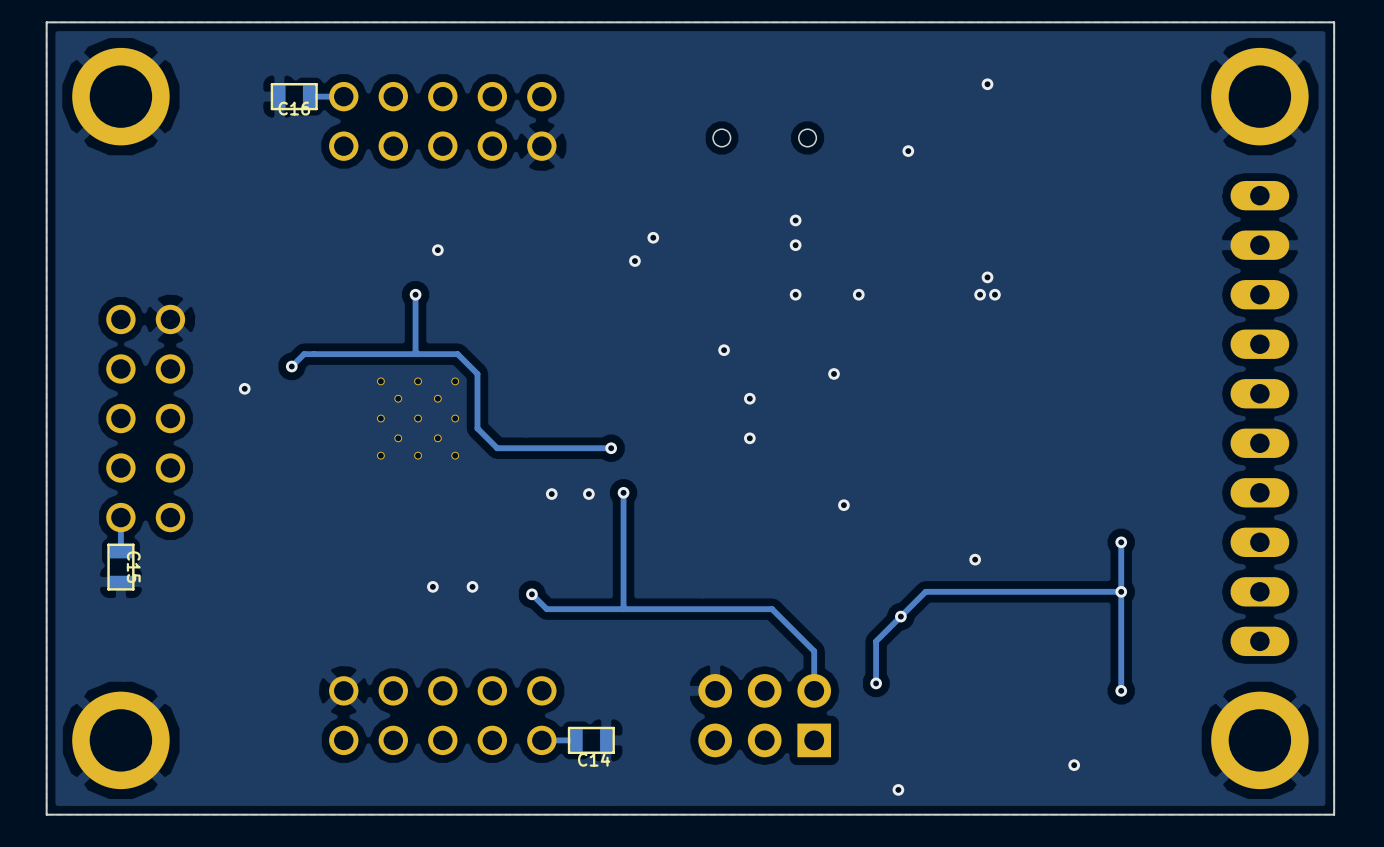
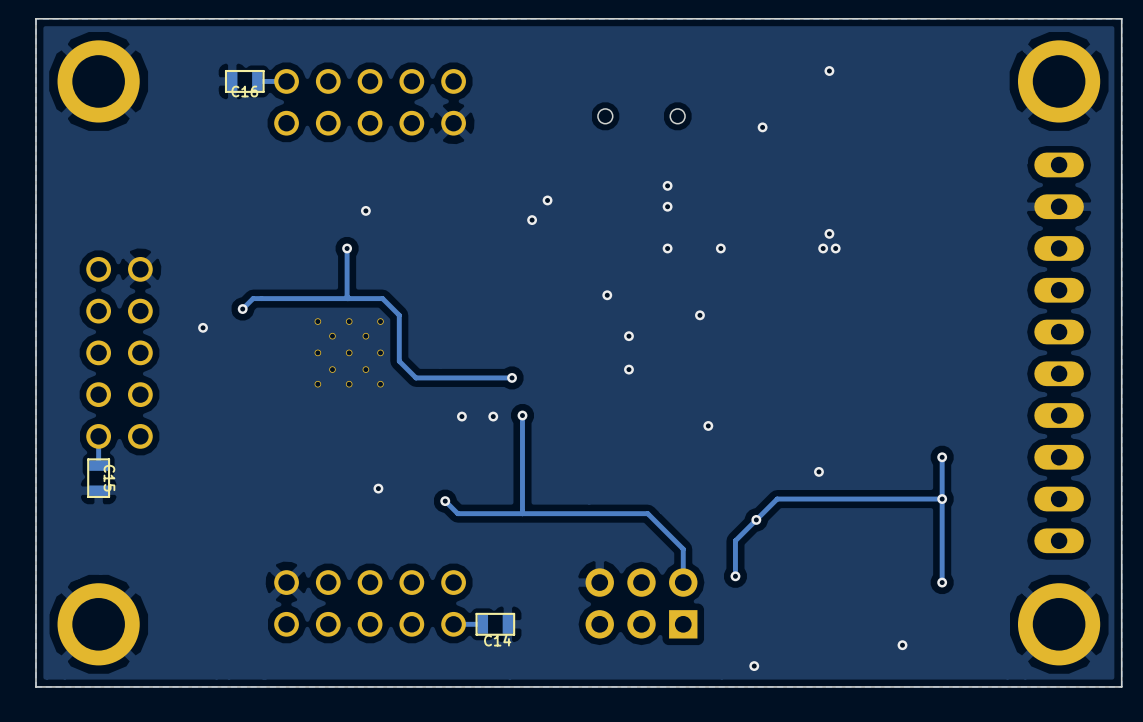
via: none -> (378, 488)
via: (432, 586) -> none
via: (472, 586) -> none

